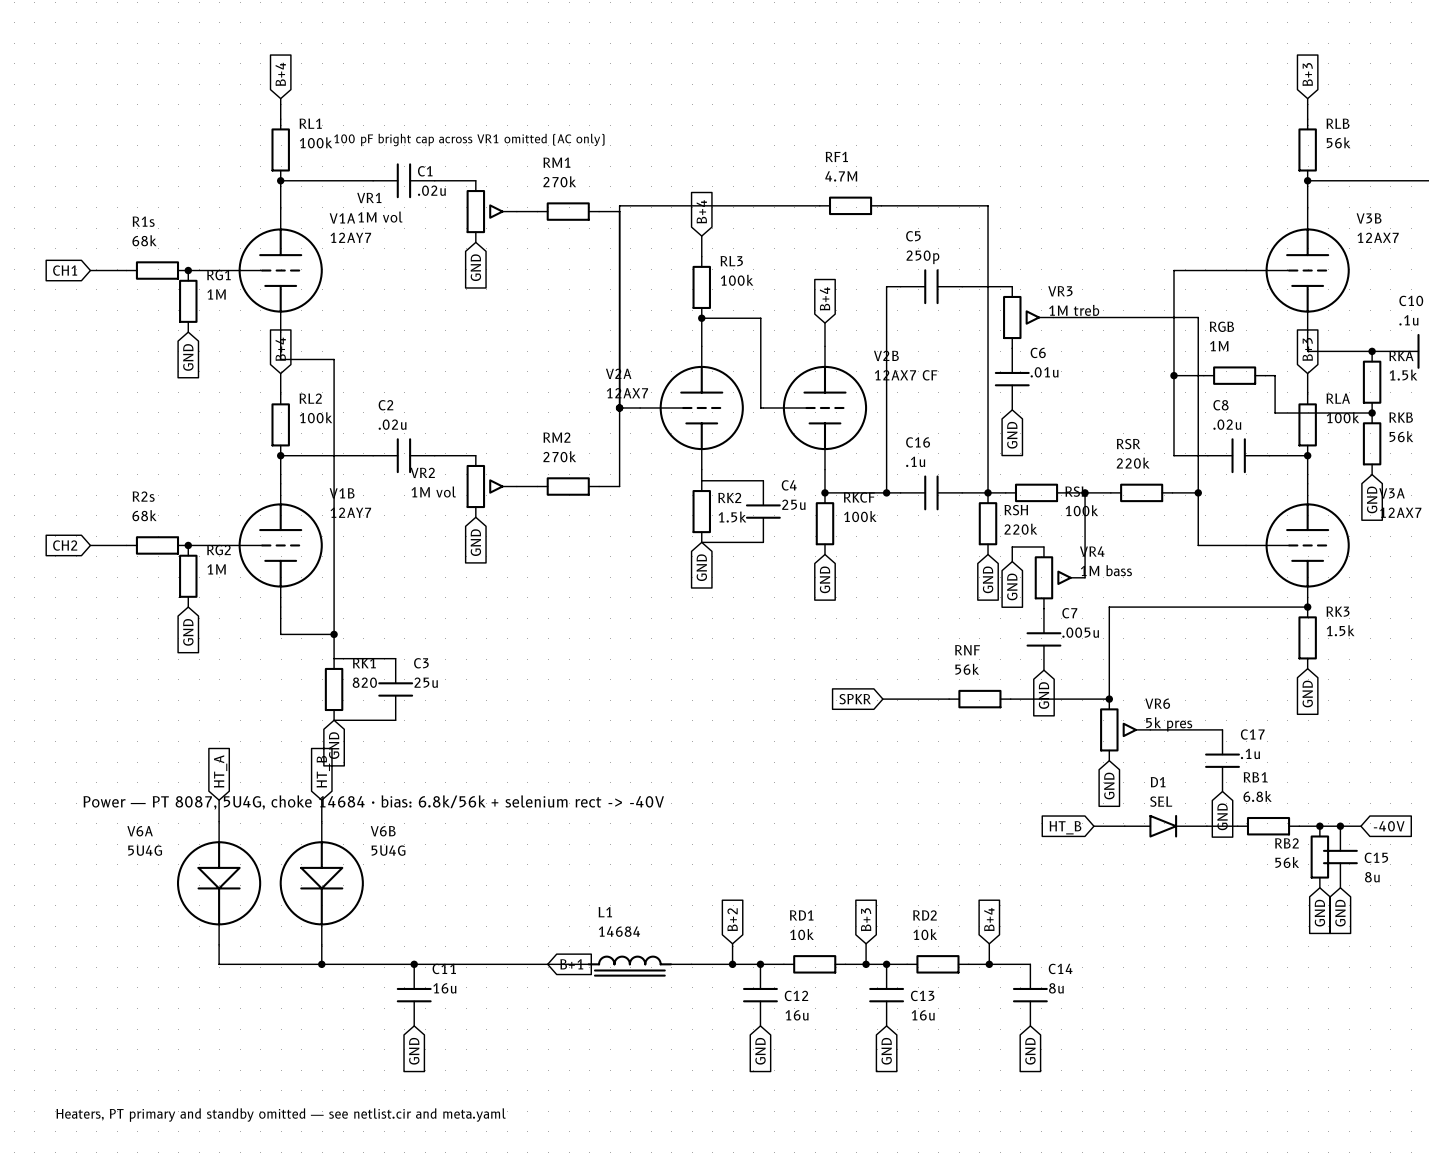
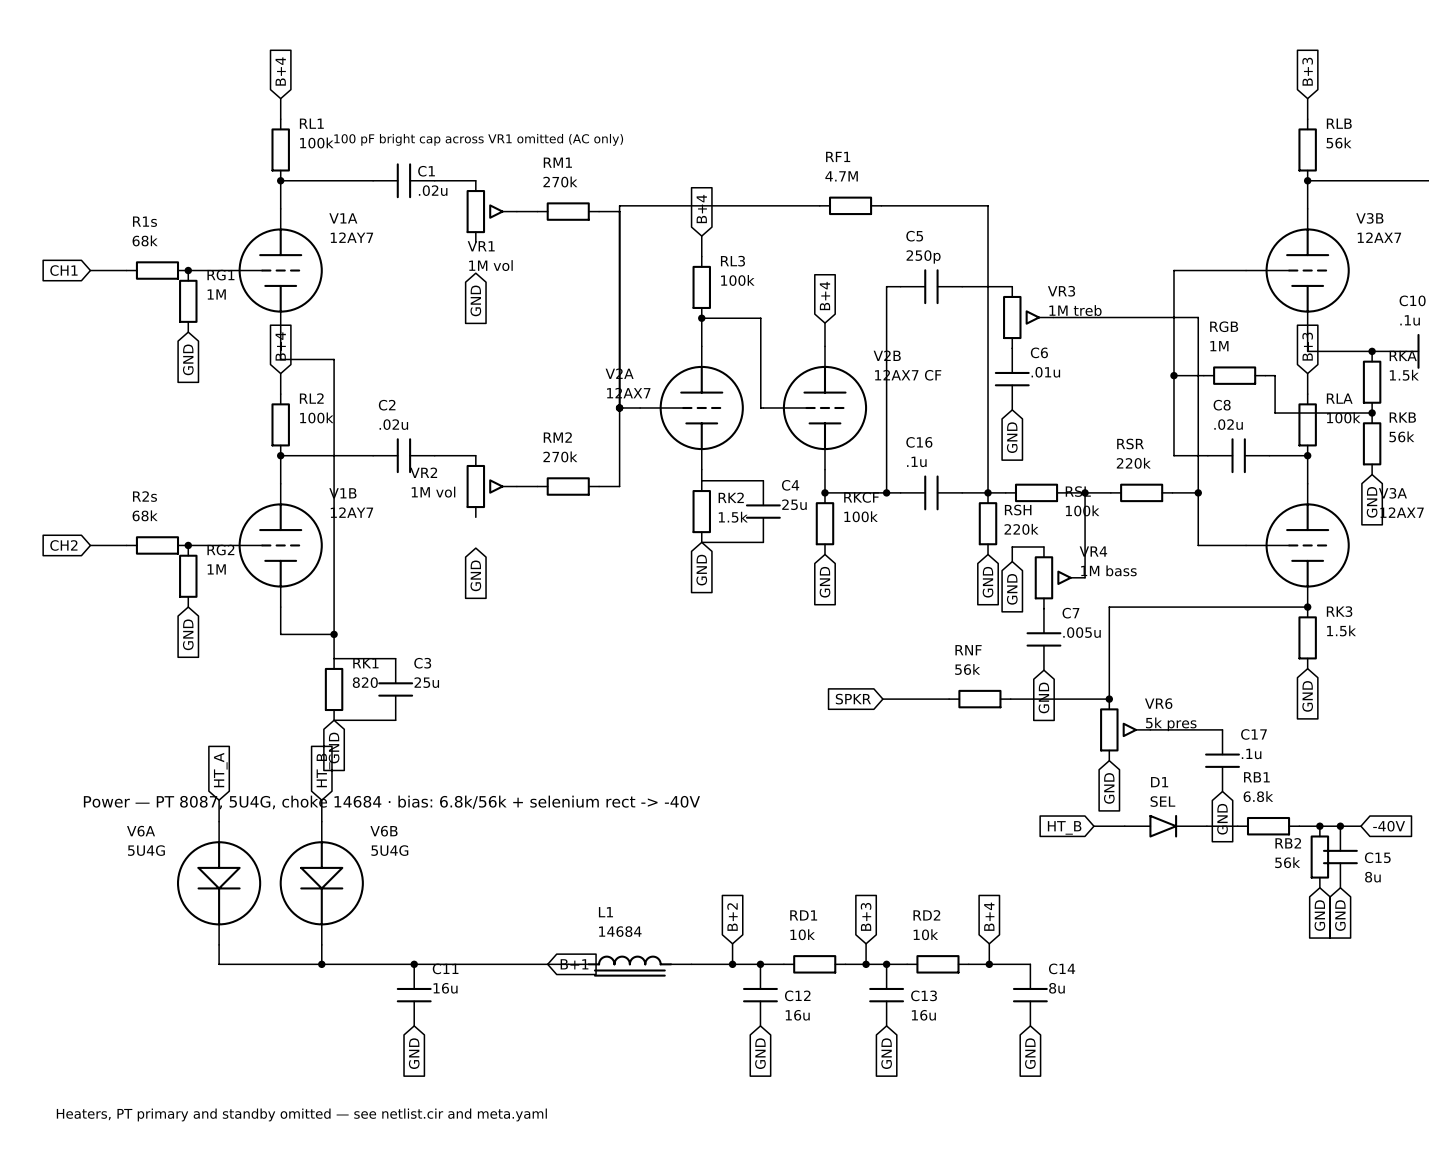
VR1 name position: VR1 (369, 198) -> VR1 (481, 246)
VR1 value position: 1M vol (380, 217) -> 1M vol (490, 265)
global label position: GND (475, 267) -> GND (475, 300)
global label position: GND (475, 542) -> GND (475, 575)

